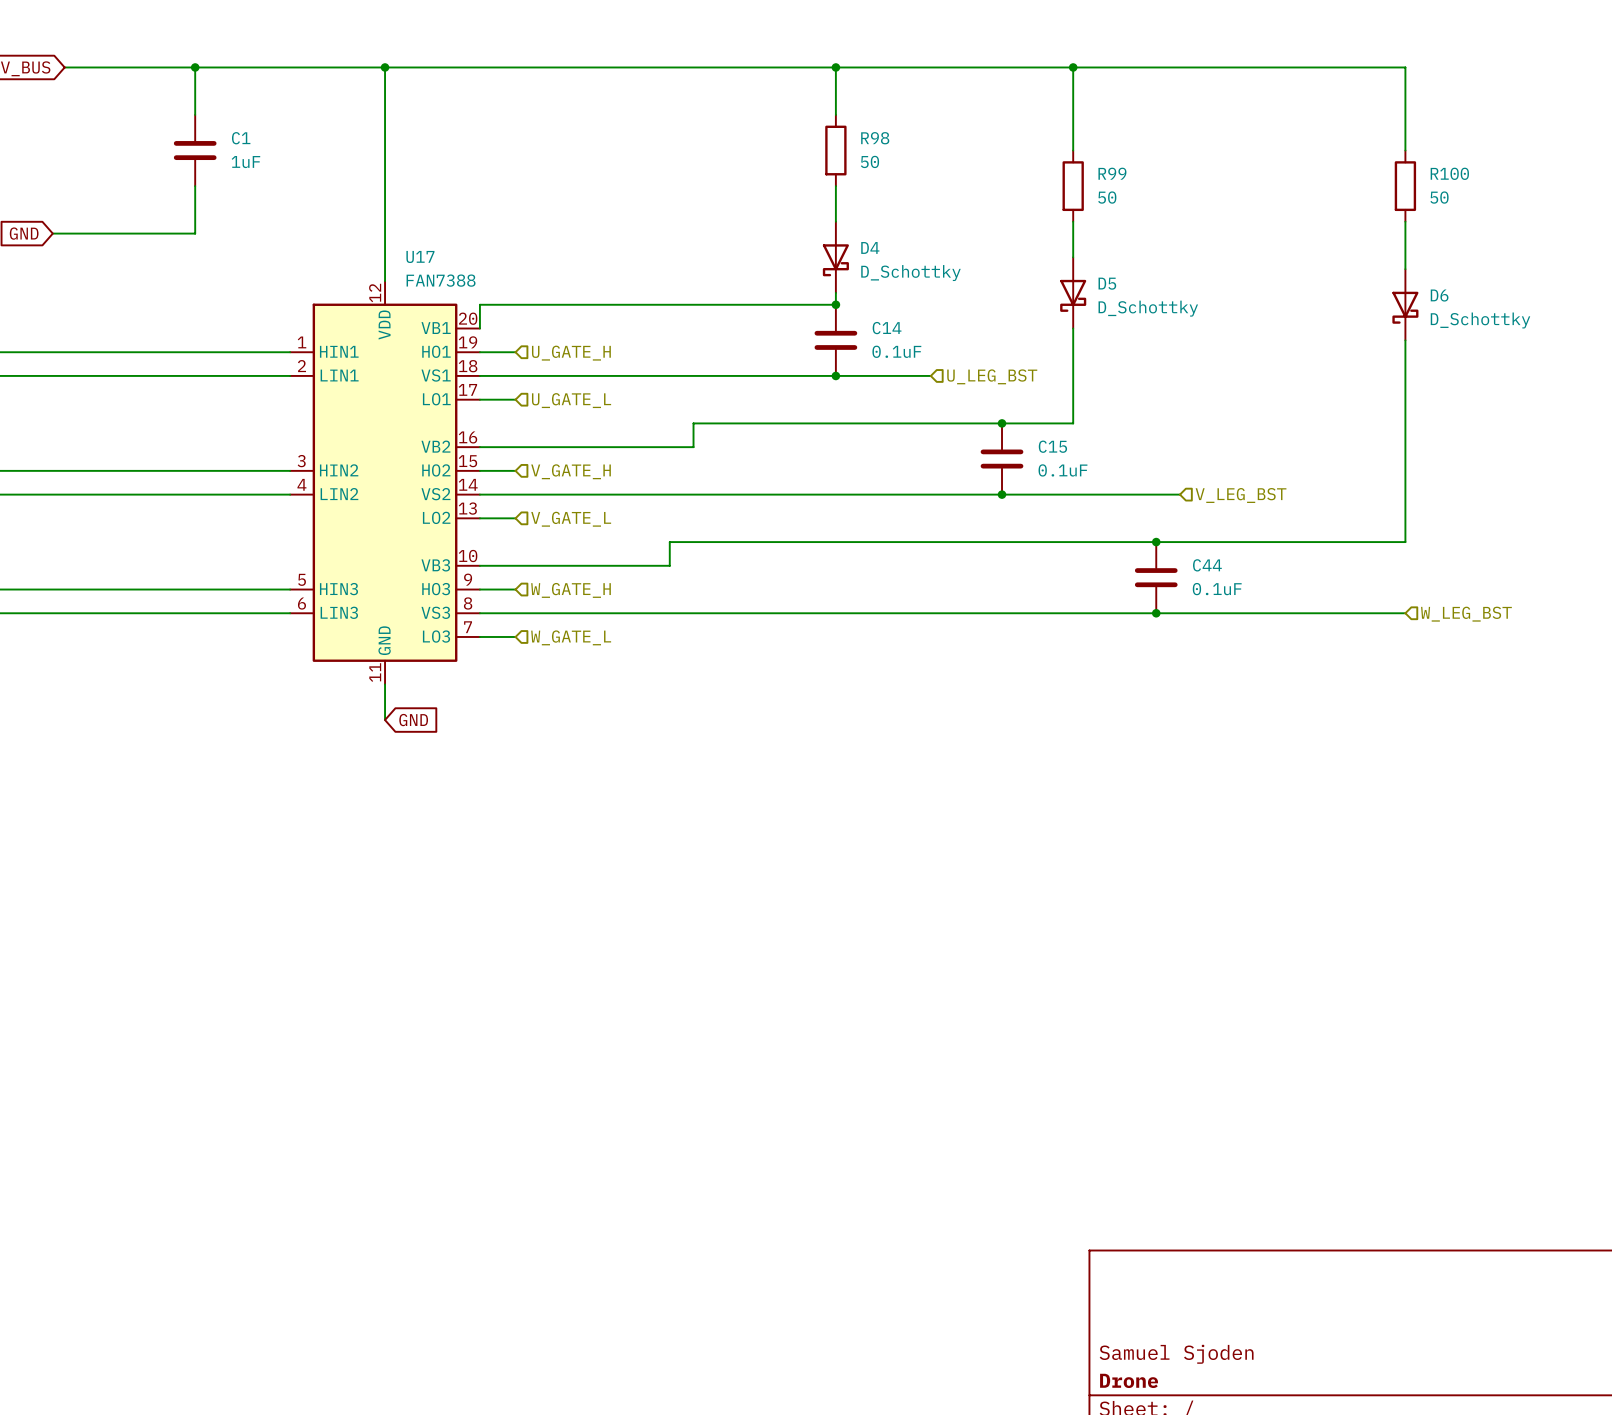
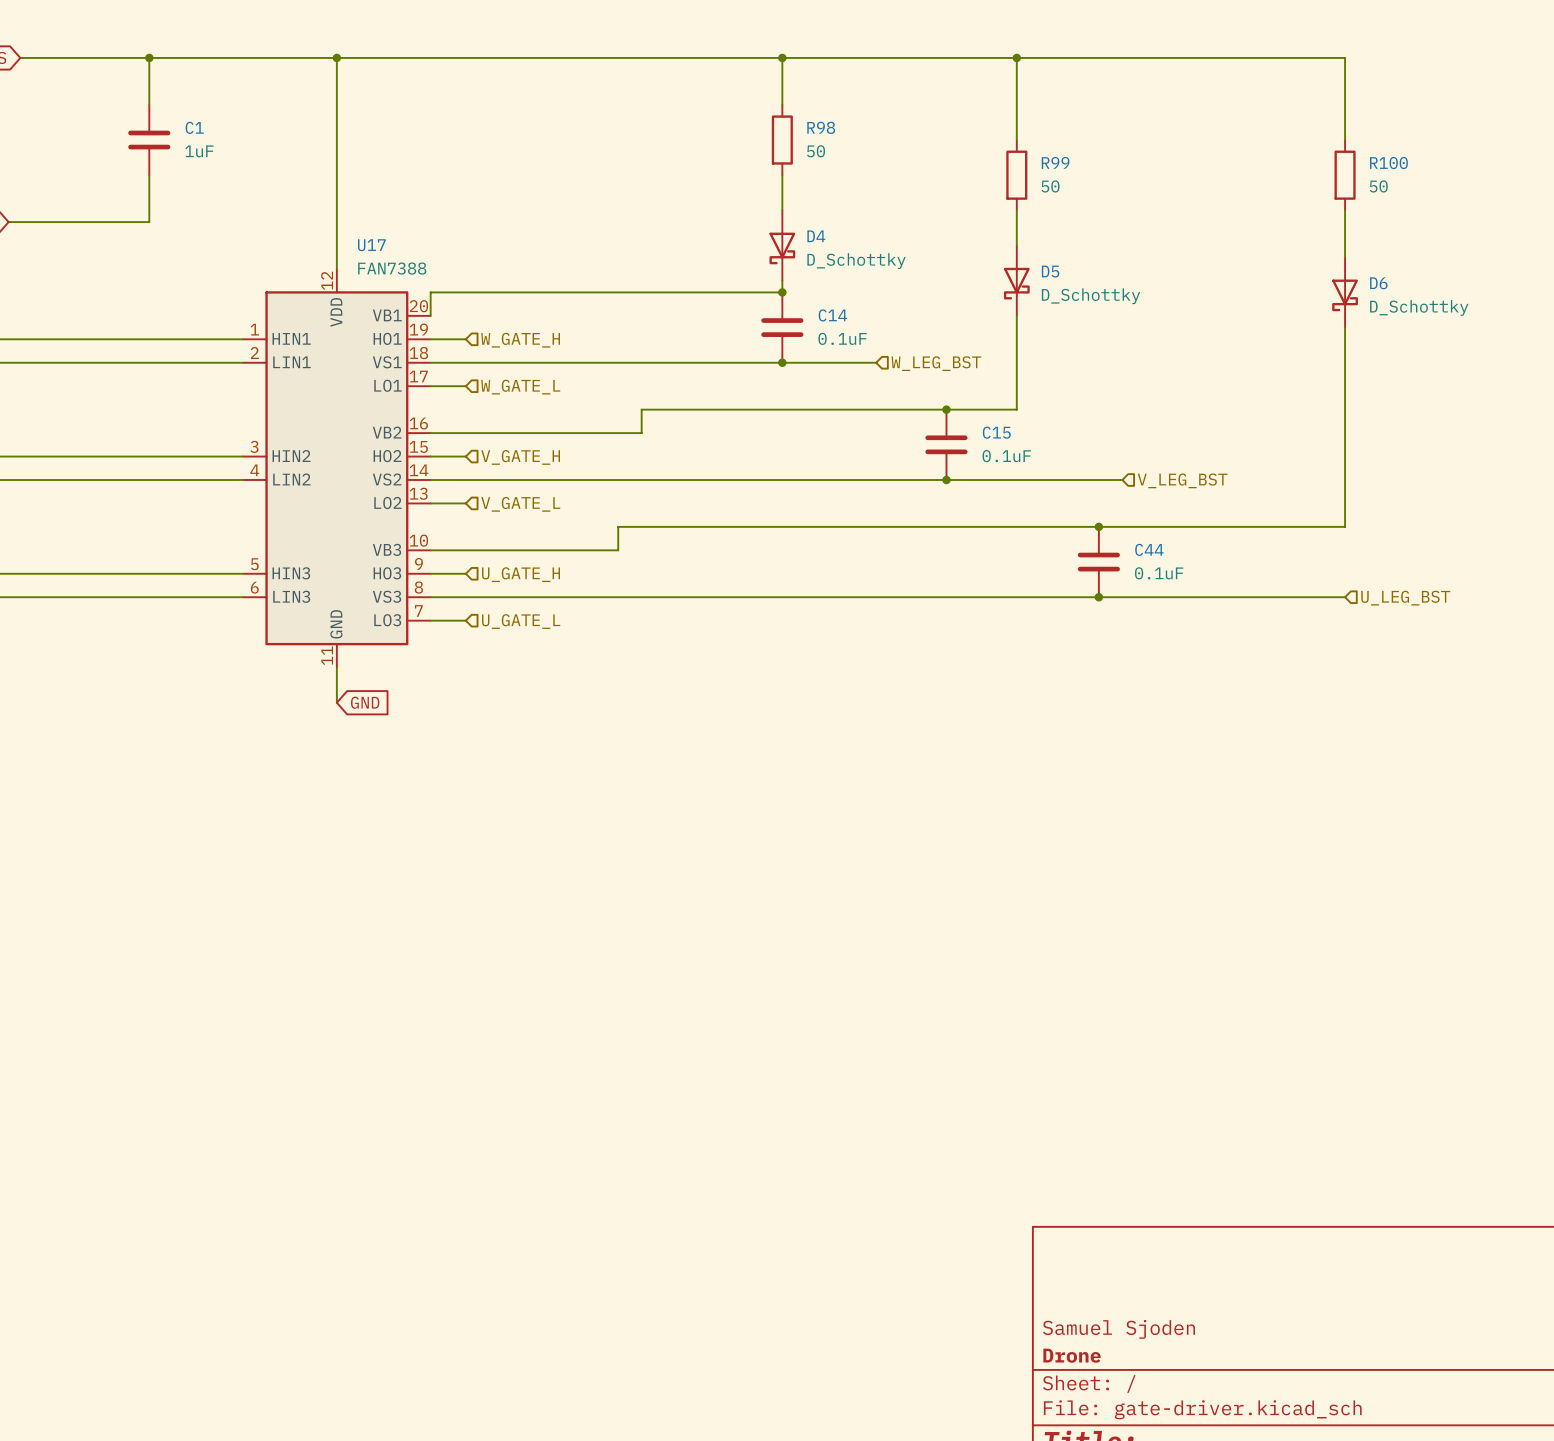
hierarchical label: U_GATE_H (571, 353) -> W_GATE_H (520, 340)
hierarchical label: U_LEG_BST (992, 376) -> W_LEG_BST (936, 363)
hierarchical label: U_GATE_L (571, 400) -> W_GATE_L (520, 387)
hierarchical label: W_GATE_H (571, 590) -> U_GATE_H (521, 574)
hierarchical label: W_LEG_BST (1466, 614) -> U_LEG_BST (1405, 598)
hierarchical label: W_GATE_L (571, 637) -> U_GATE_L (521, 621)

